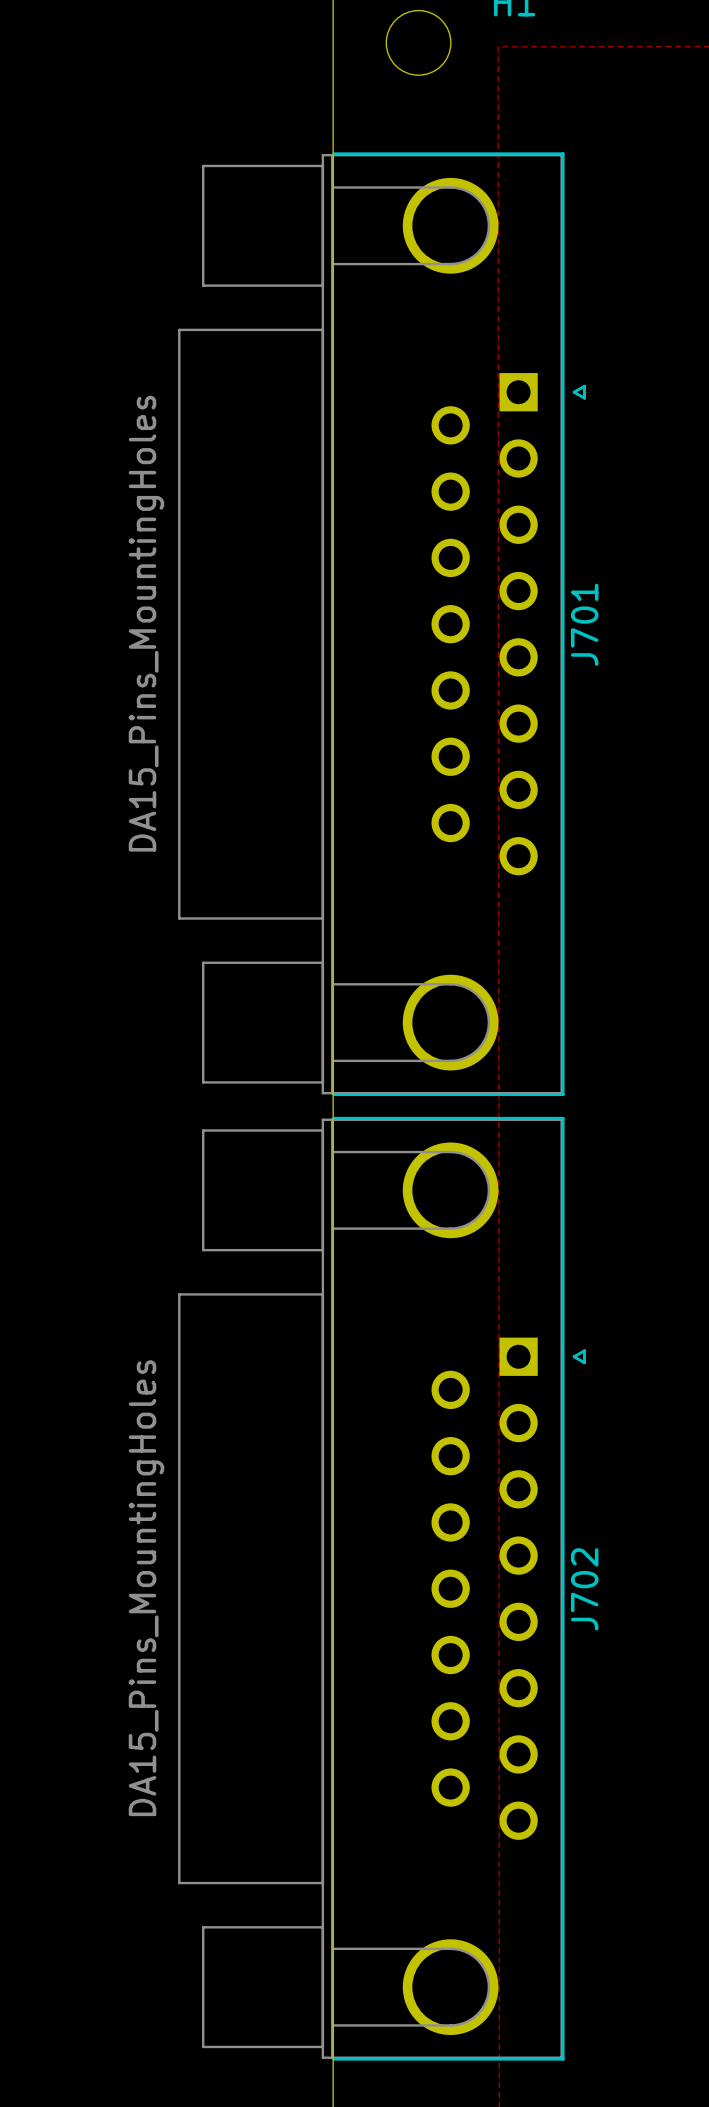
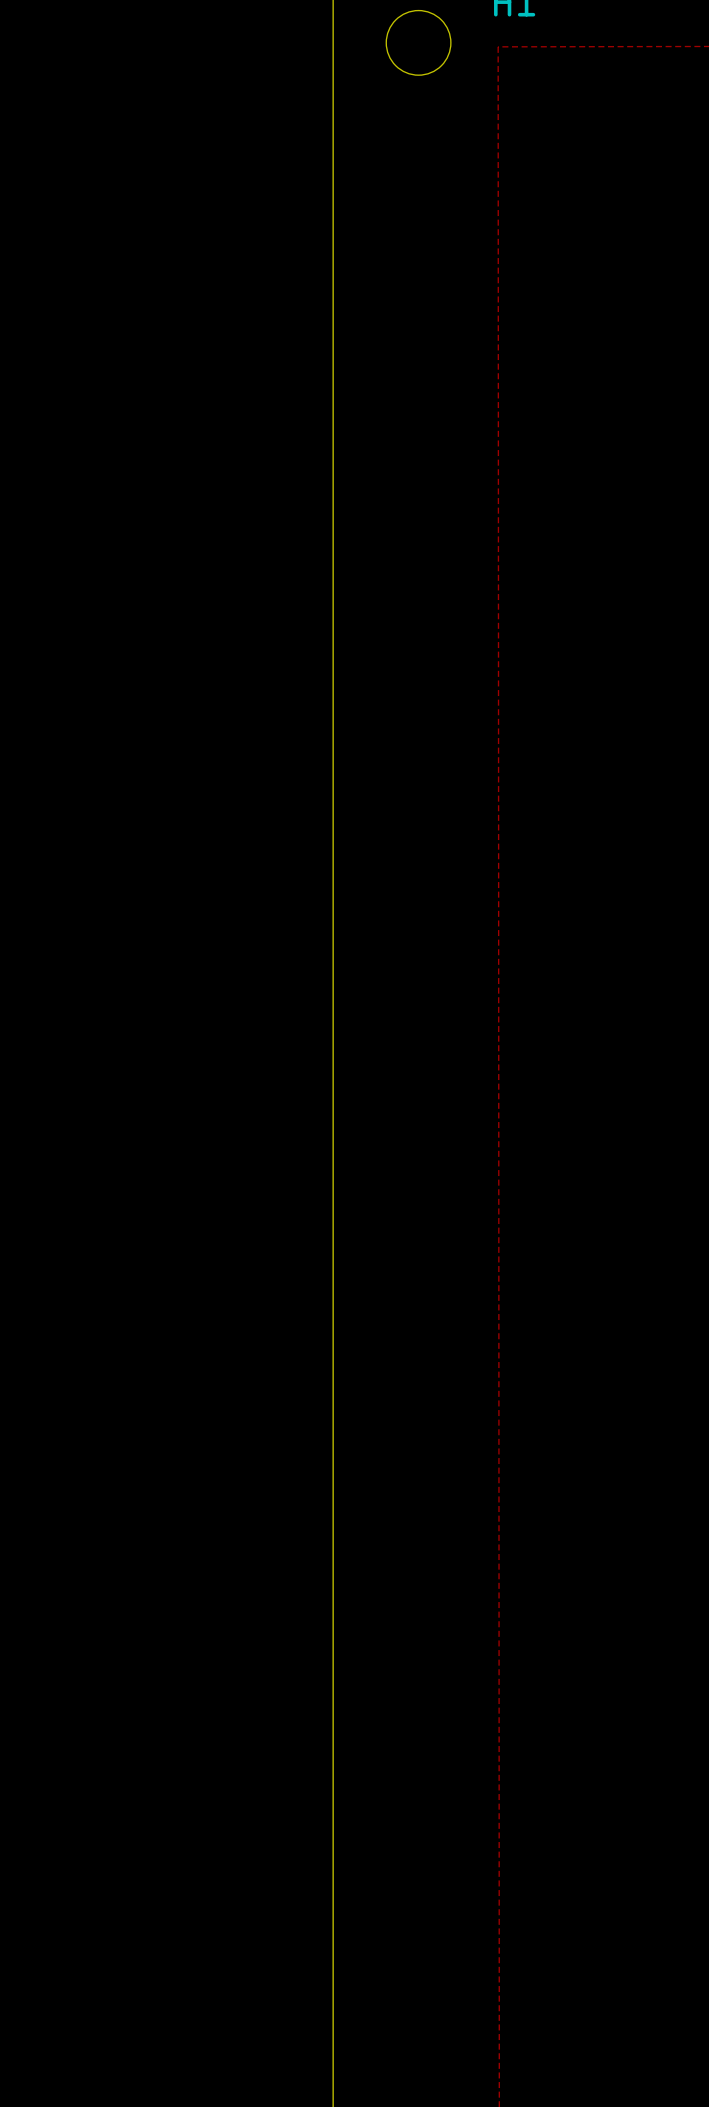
J701: DA15_Pins_MountingHoles (382, 624) -> none
J702: DA15_Pins_MountingHoles (382, 1588) -> none

